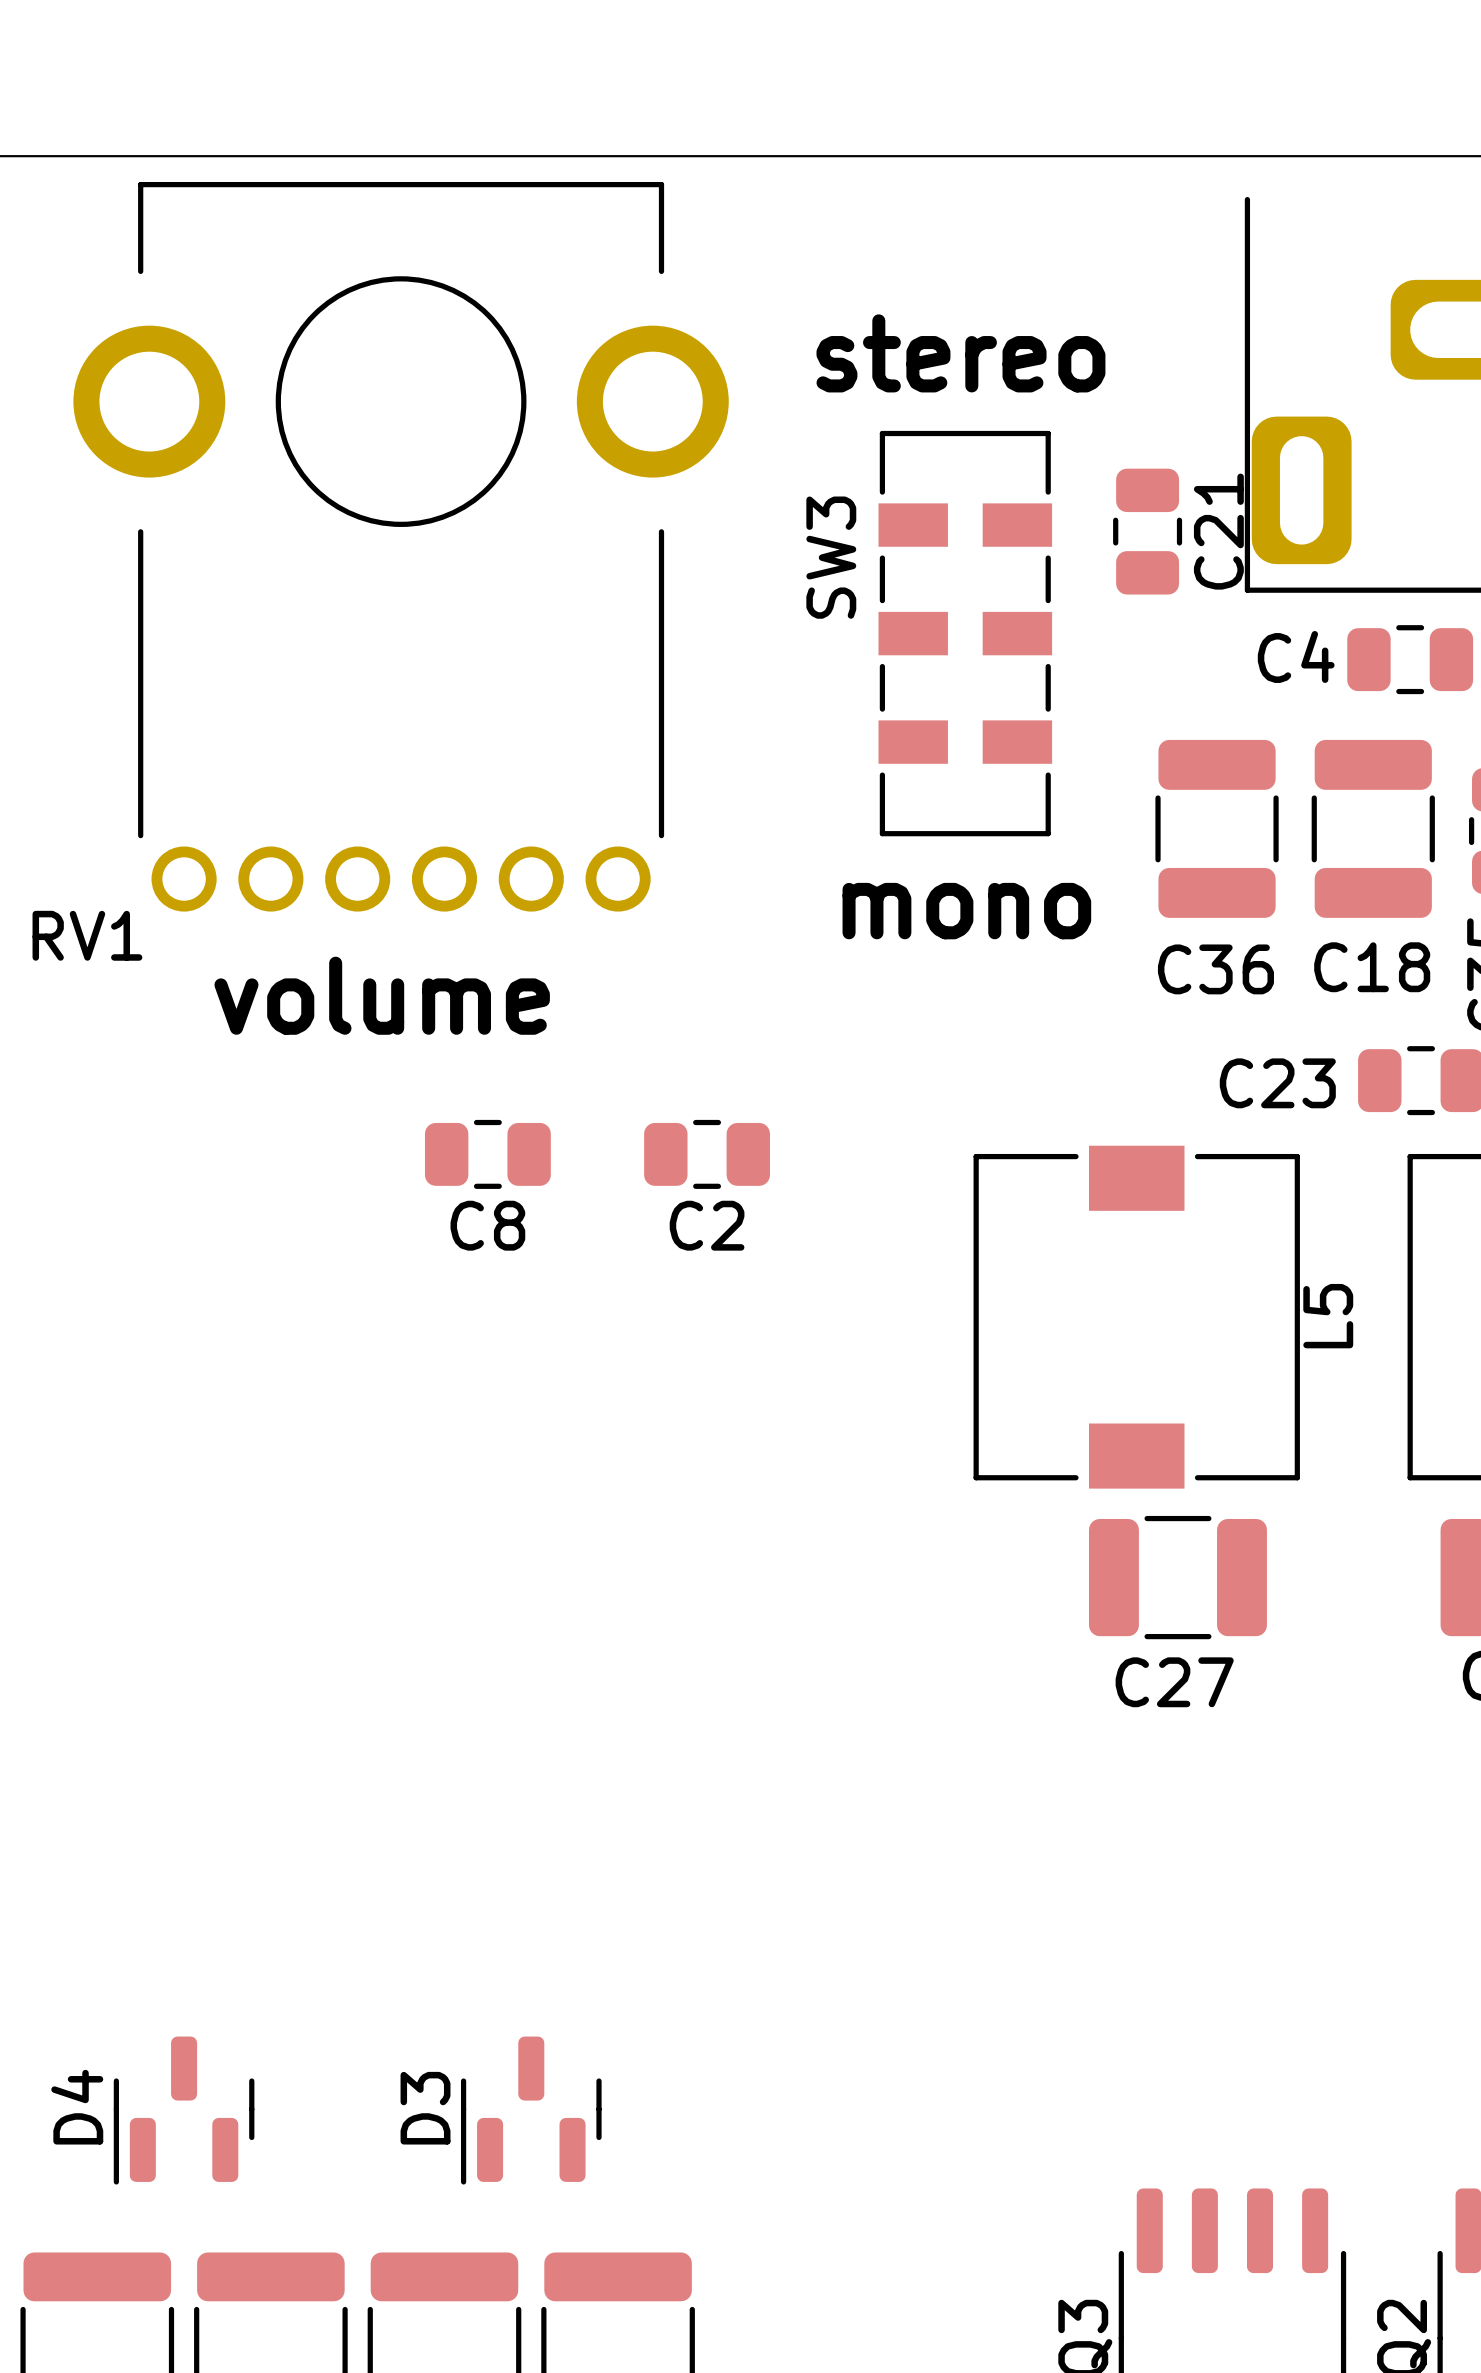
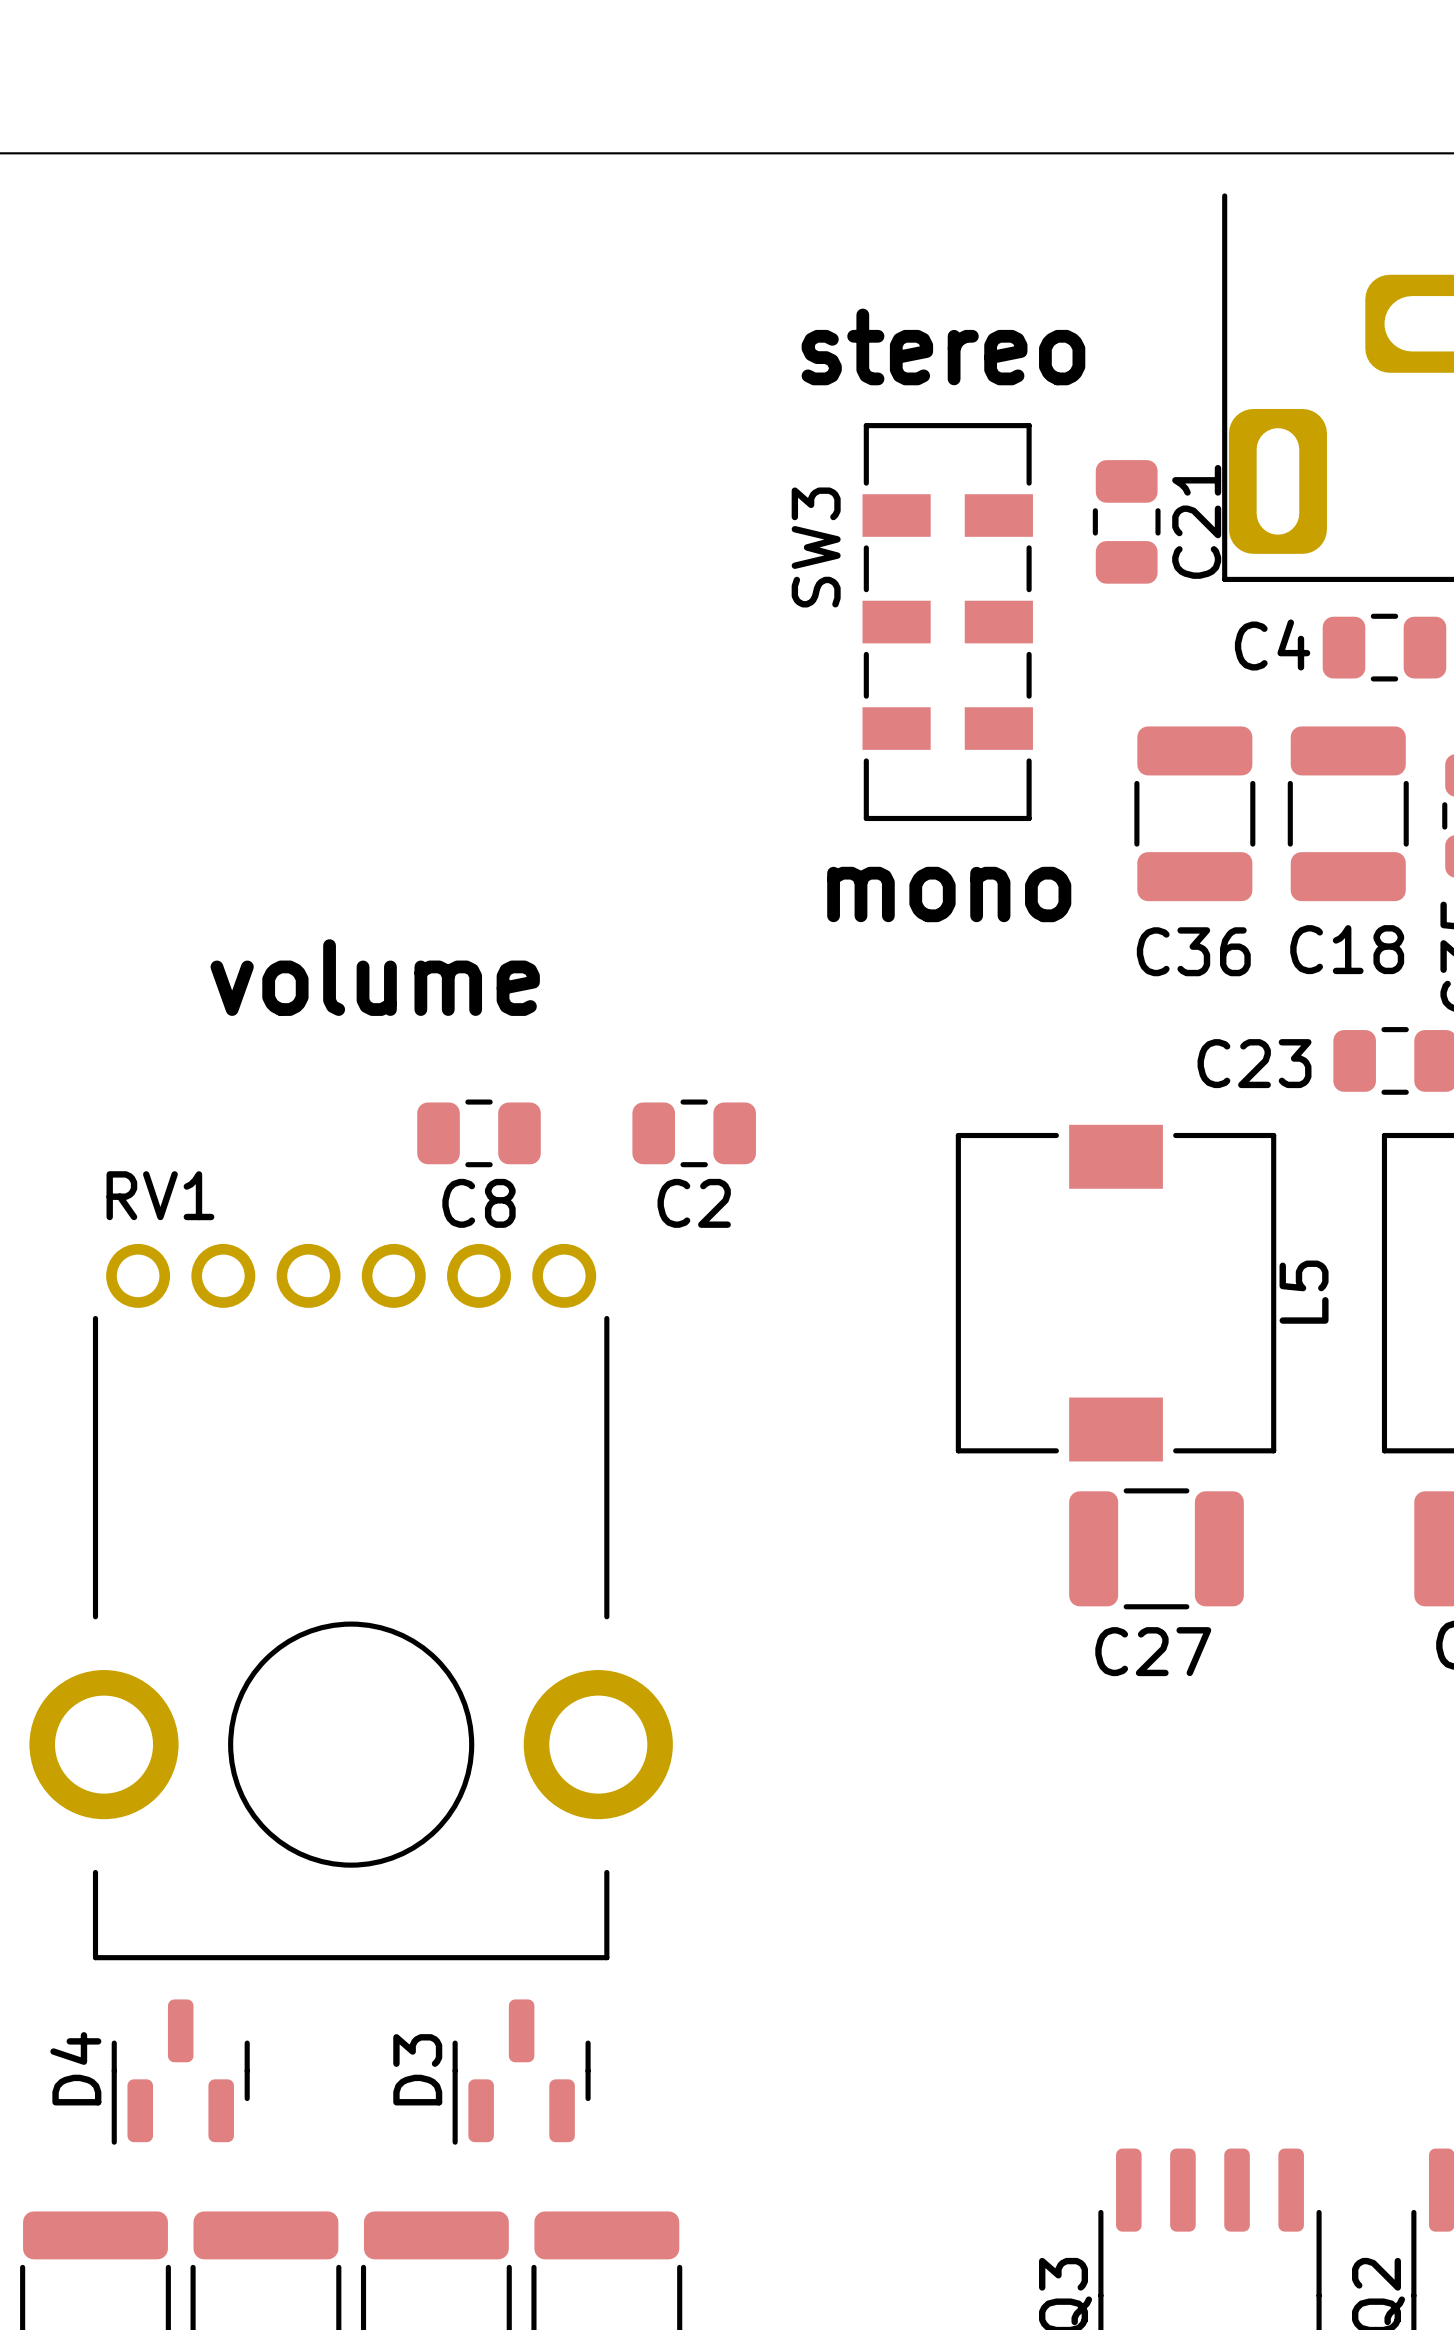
RV1 rotation: 0° (401, 546) -> 180° (351, 1602)
RV1 position: (401, 546) -> (351, 1602)
RV1 name position: RV1 (87, 935) -> RV1 (160, 1195)

